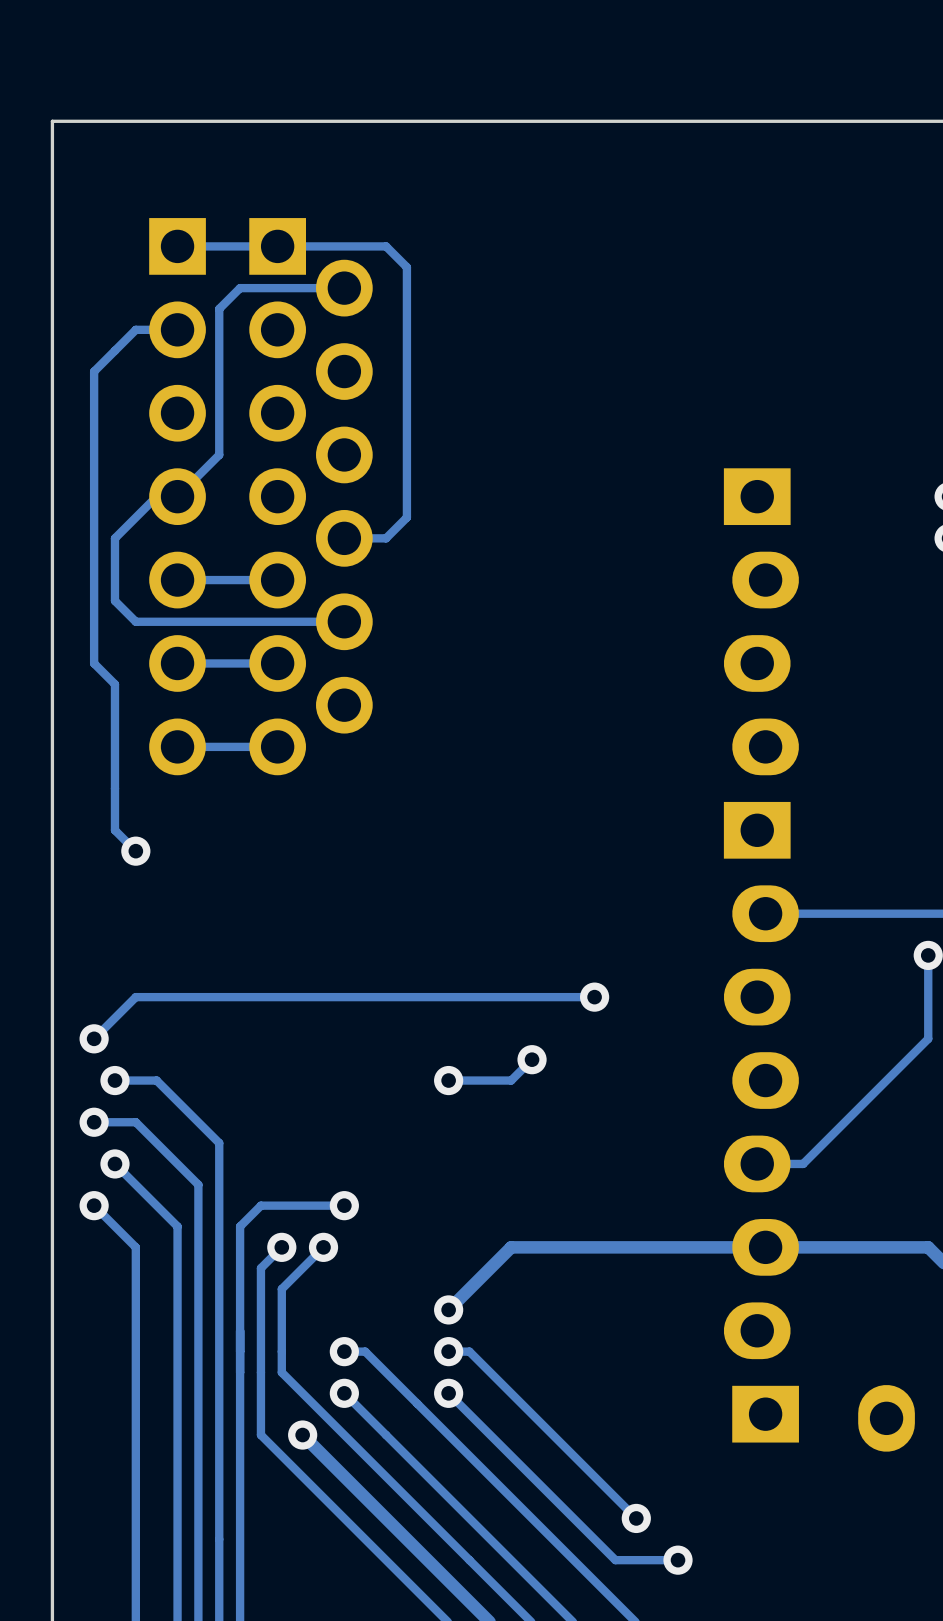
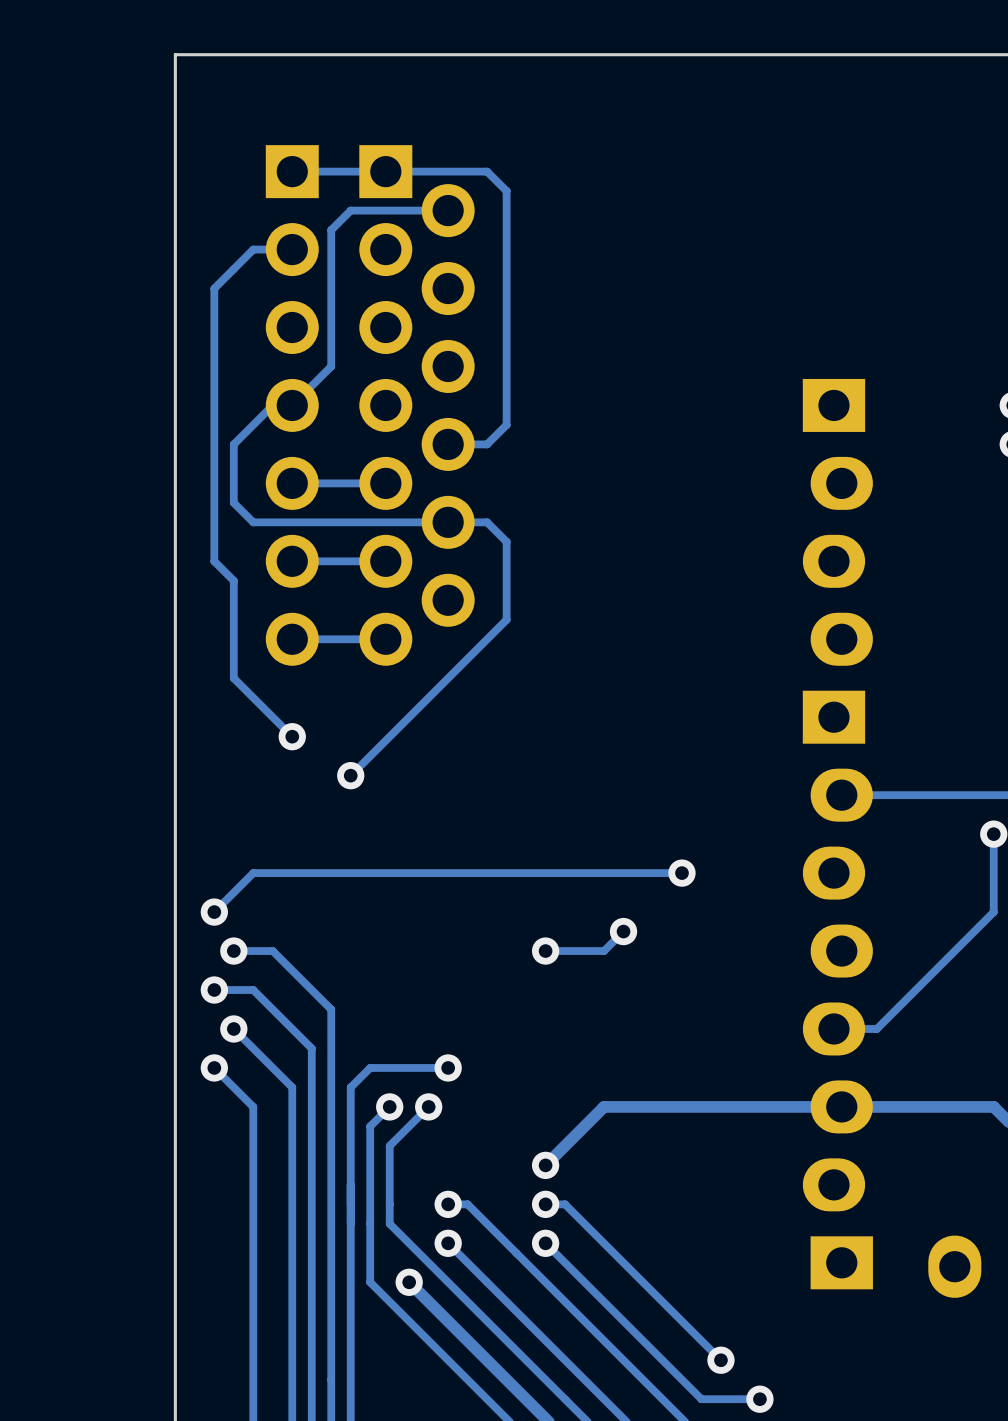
track: none -> (448, 522) (487, 522) (506, 541) (506, 619) (350, 775)
track: (114, 788) (114, 830) (135, 851) -> (233, 678) (292, 736)
via position: (135, 851) -> (292, 736)
via: none -> (350, 775)

